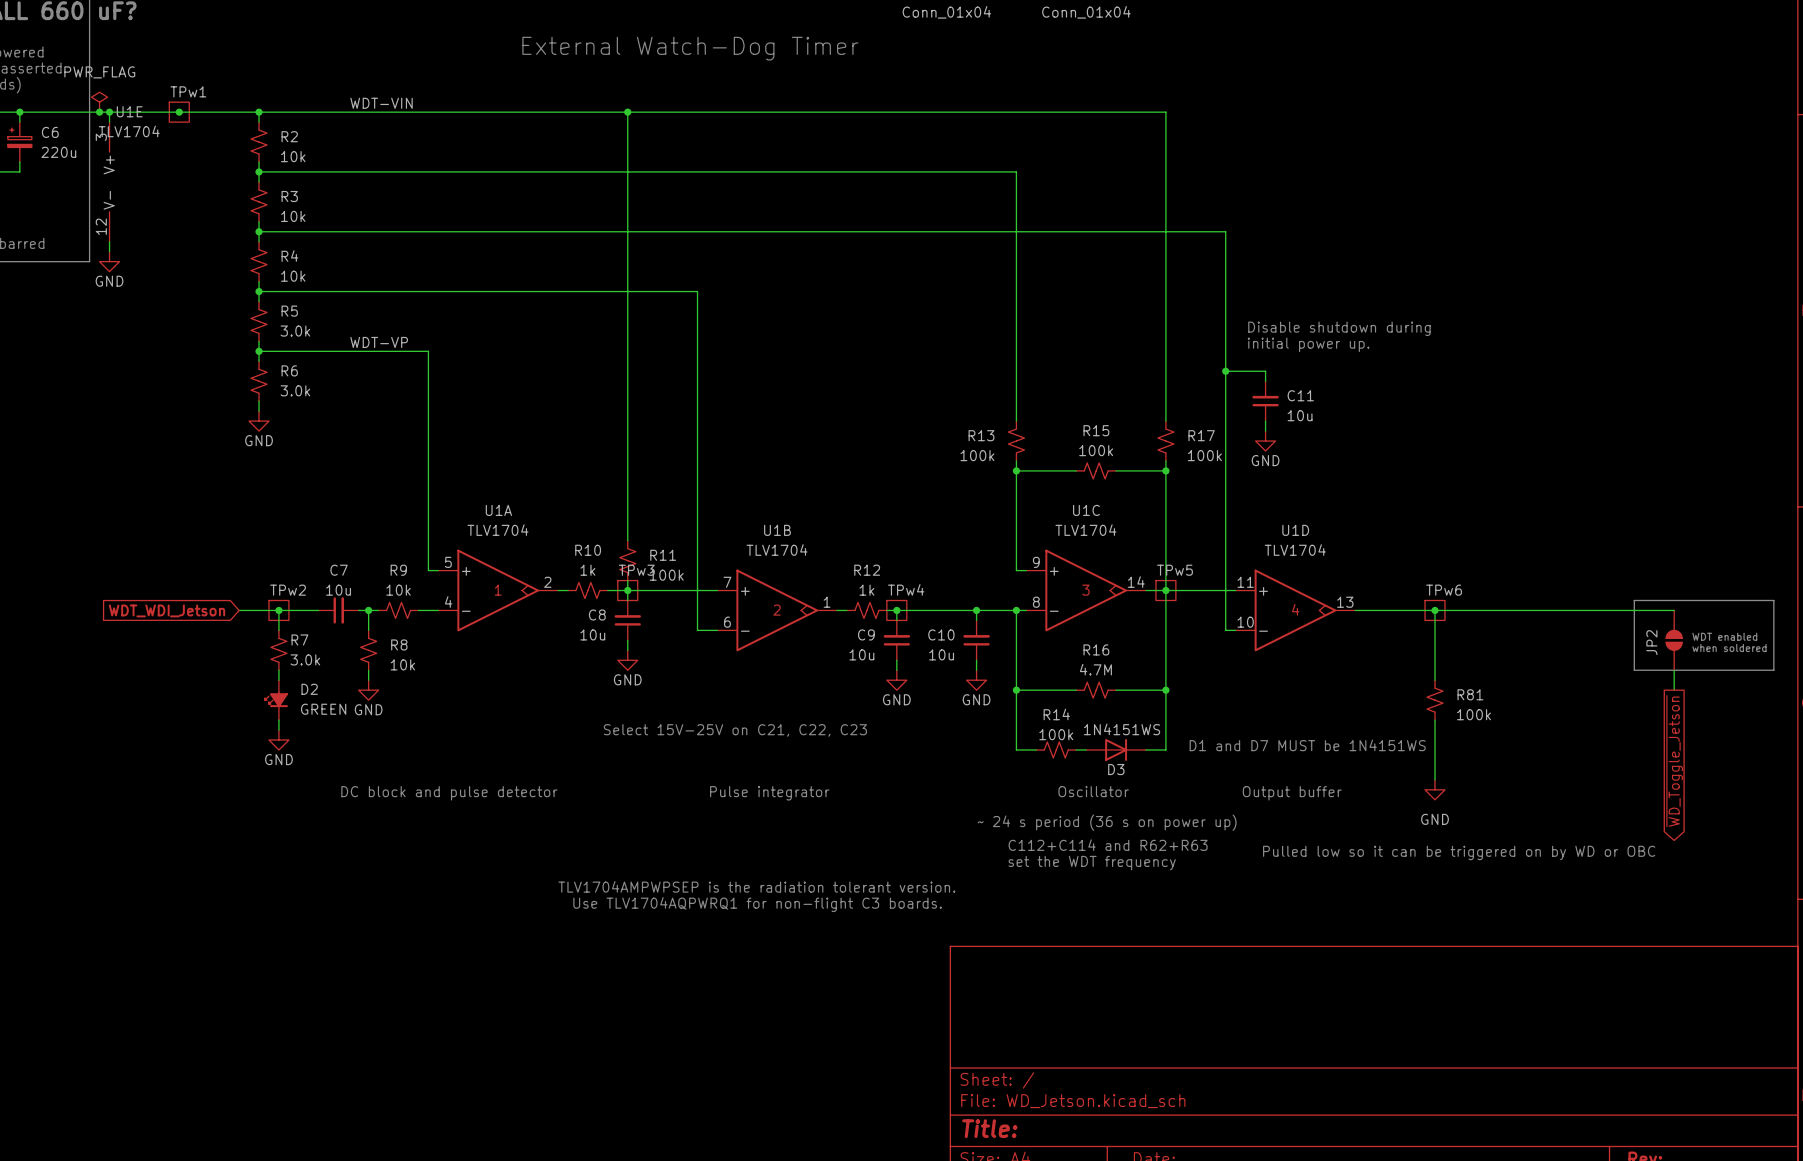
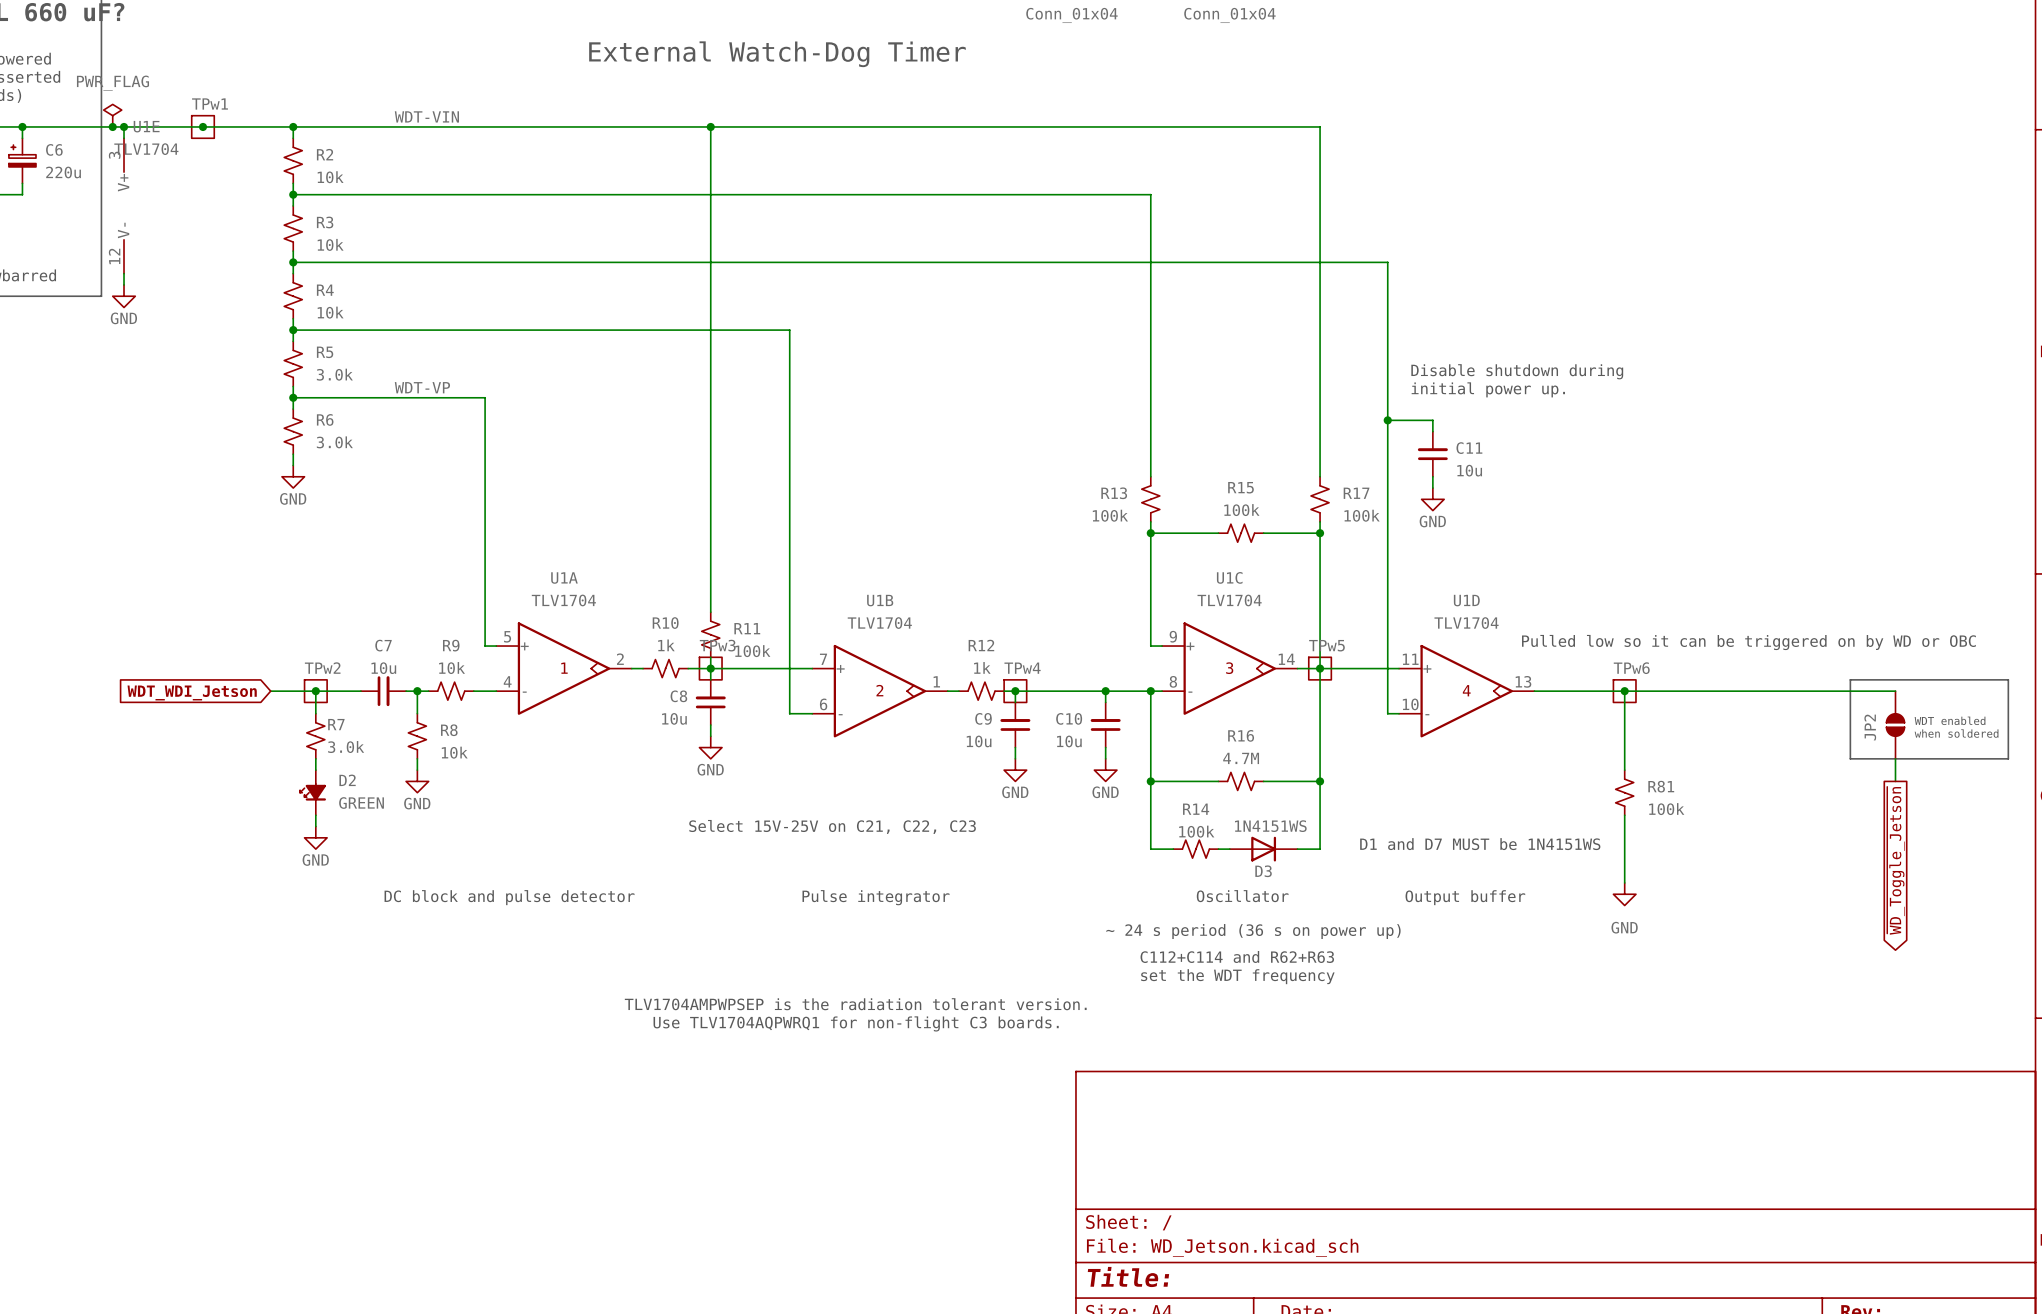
text: none -> Pulled low so it can be triggered on by WD or OBC (1748, 642)
text: Pulled low so it can be triggered on by WD or OBC (1459, 852) -> none

